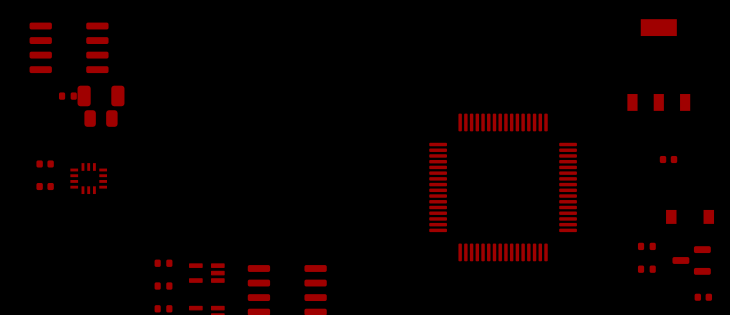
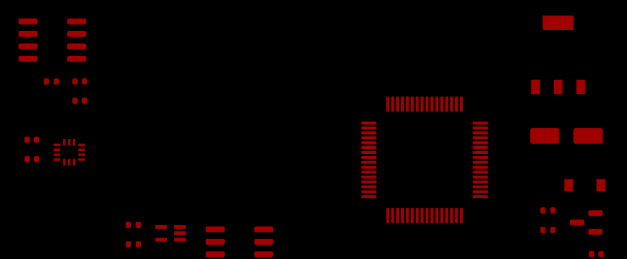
part footprint: [77, 85, 125, 107] -> [72, 78, 88, 85]
part footprint: [84, 110, 118, 127] -> [72, 97, 88, 104]
part footprint: [659, 155, 678, 164] -> [530, 128, 603, 144]

